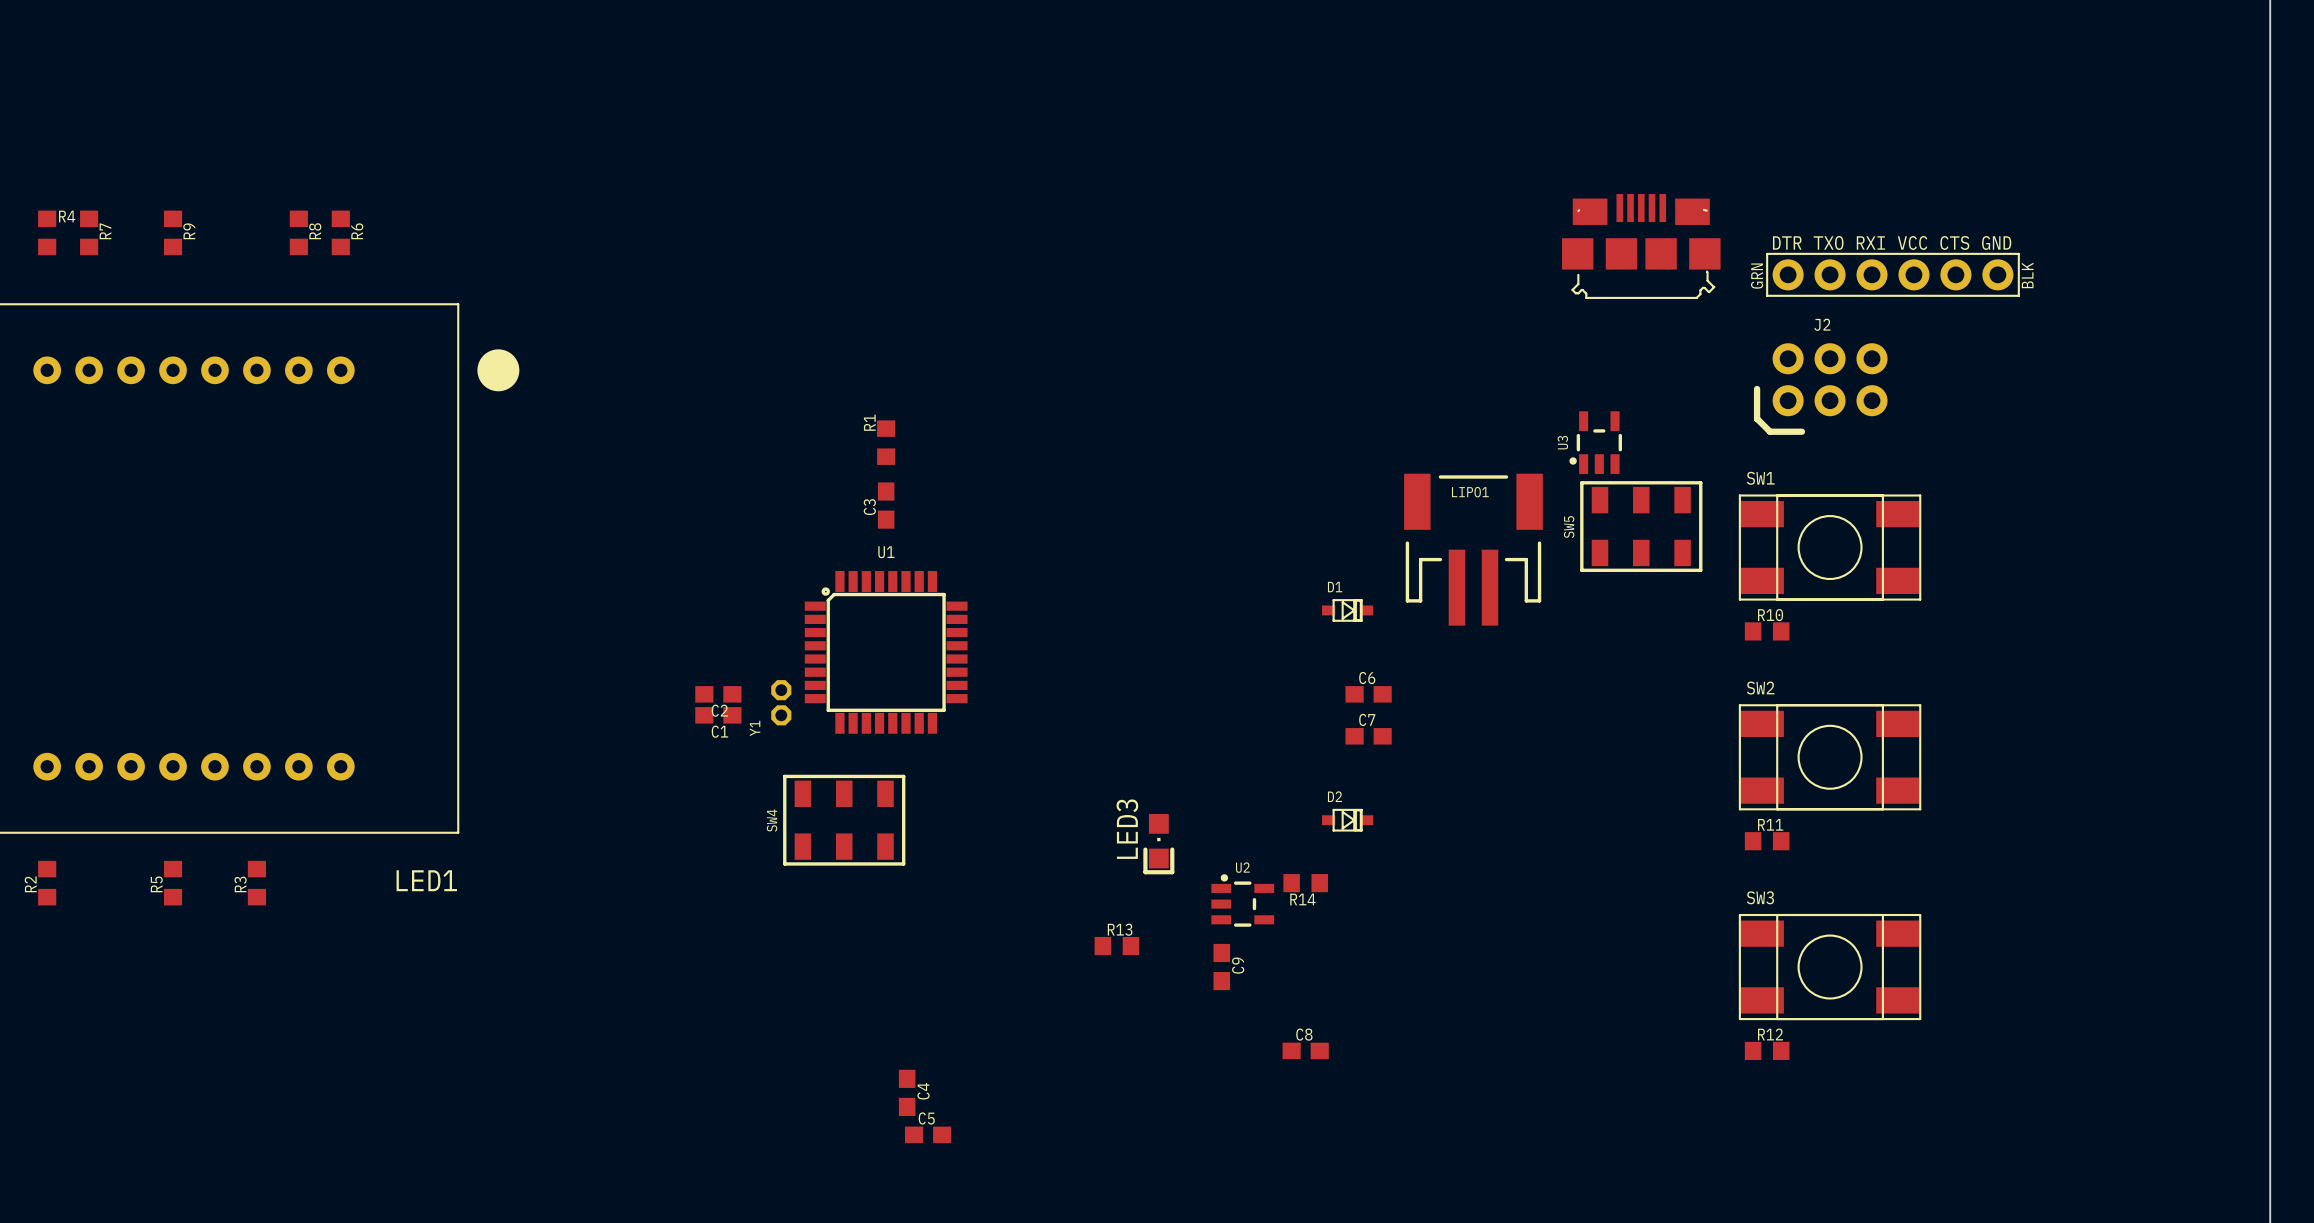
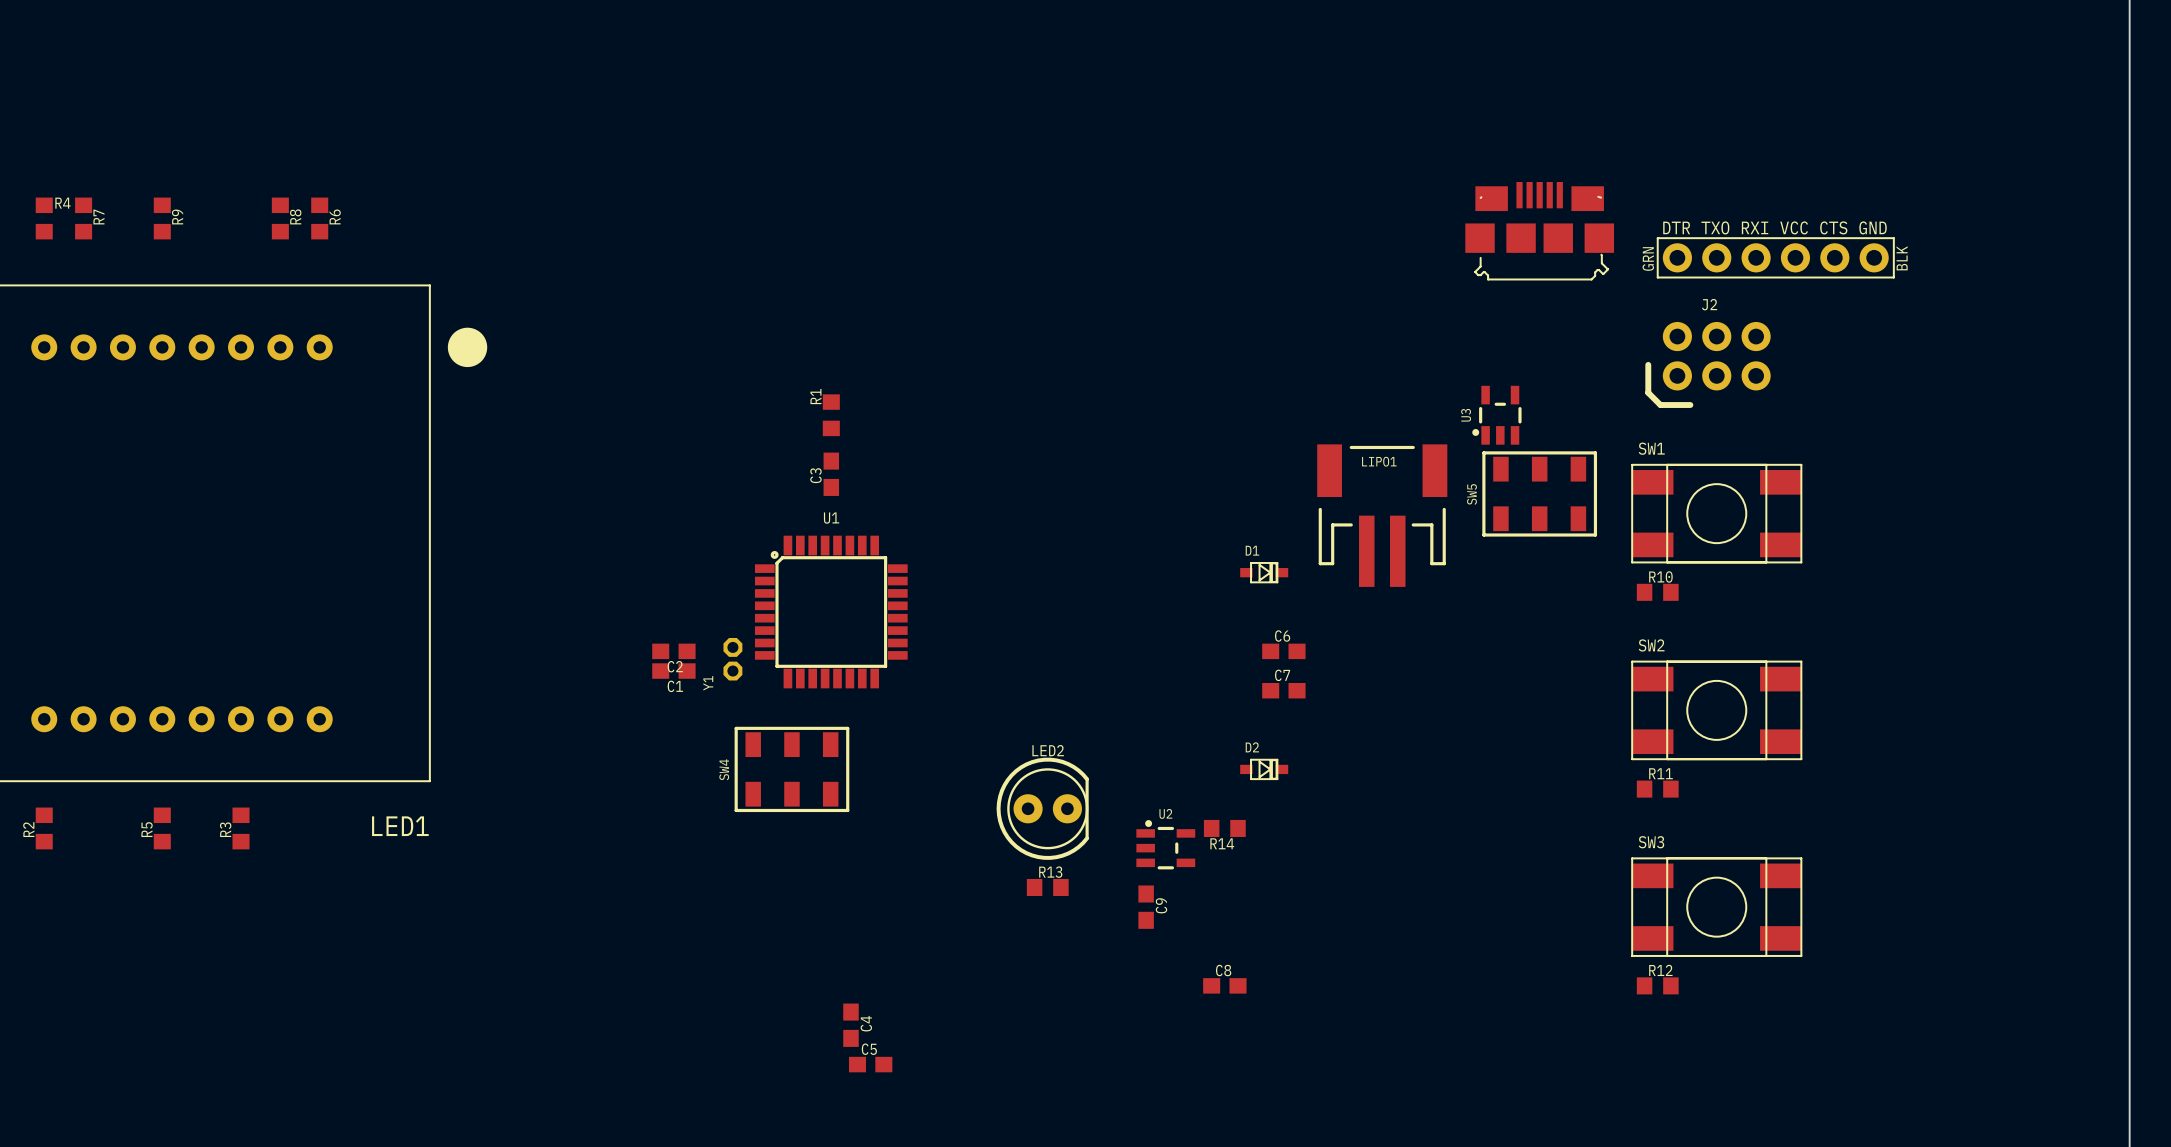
LED3: (1158, 844) -> none
LED2: none -> (1042, 808)

